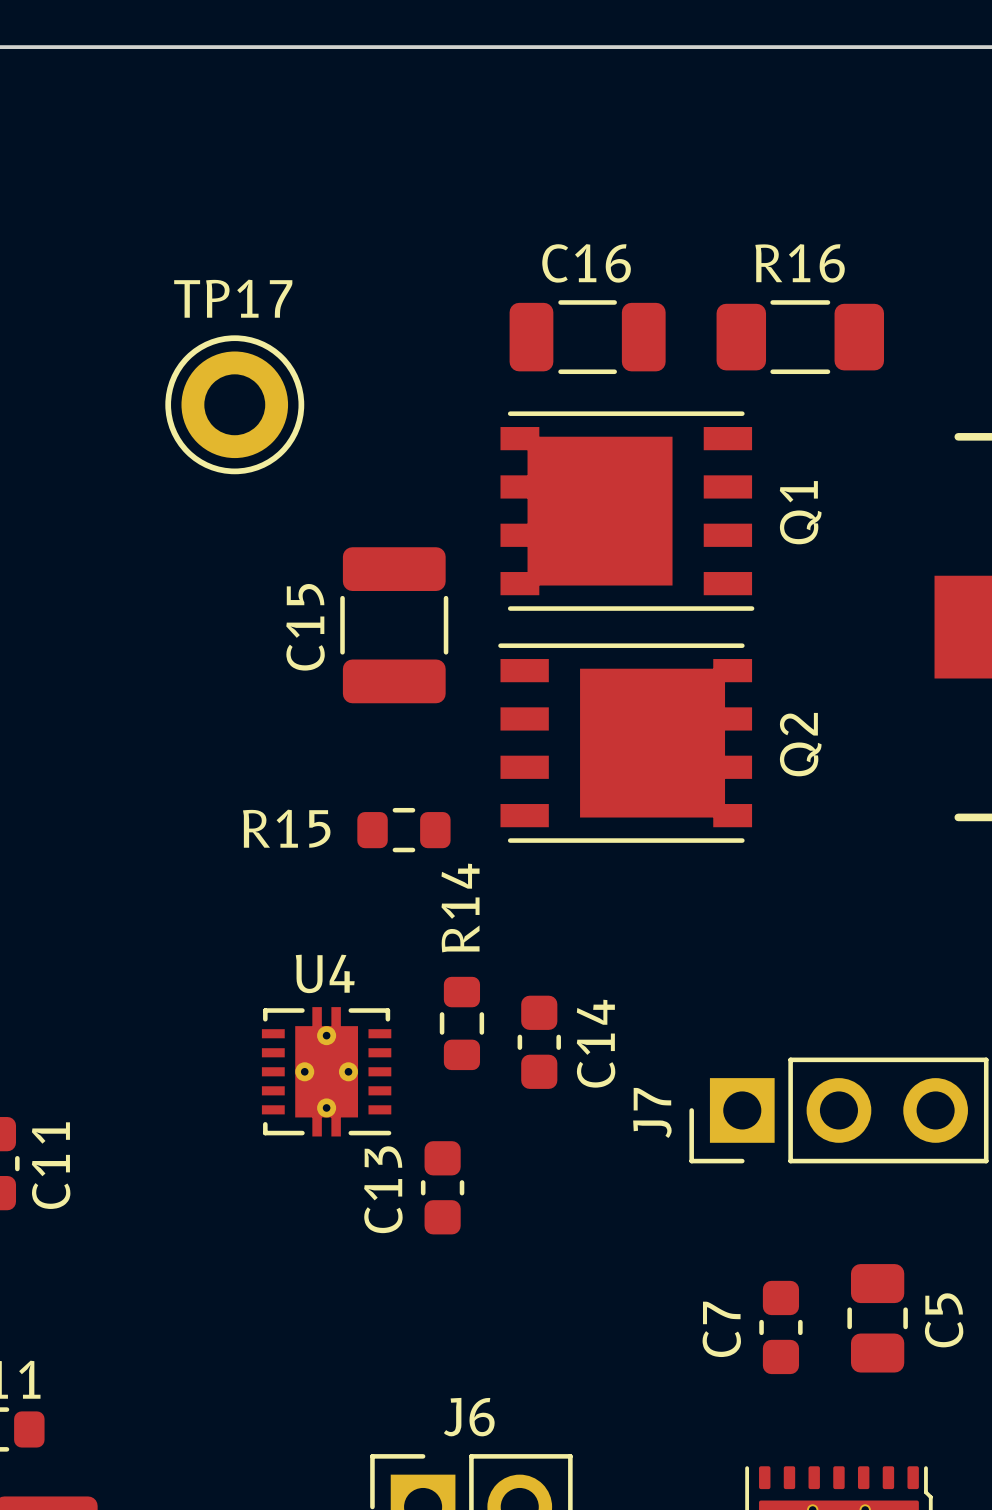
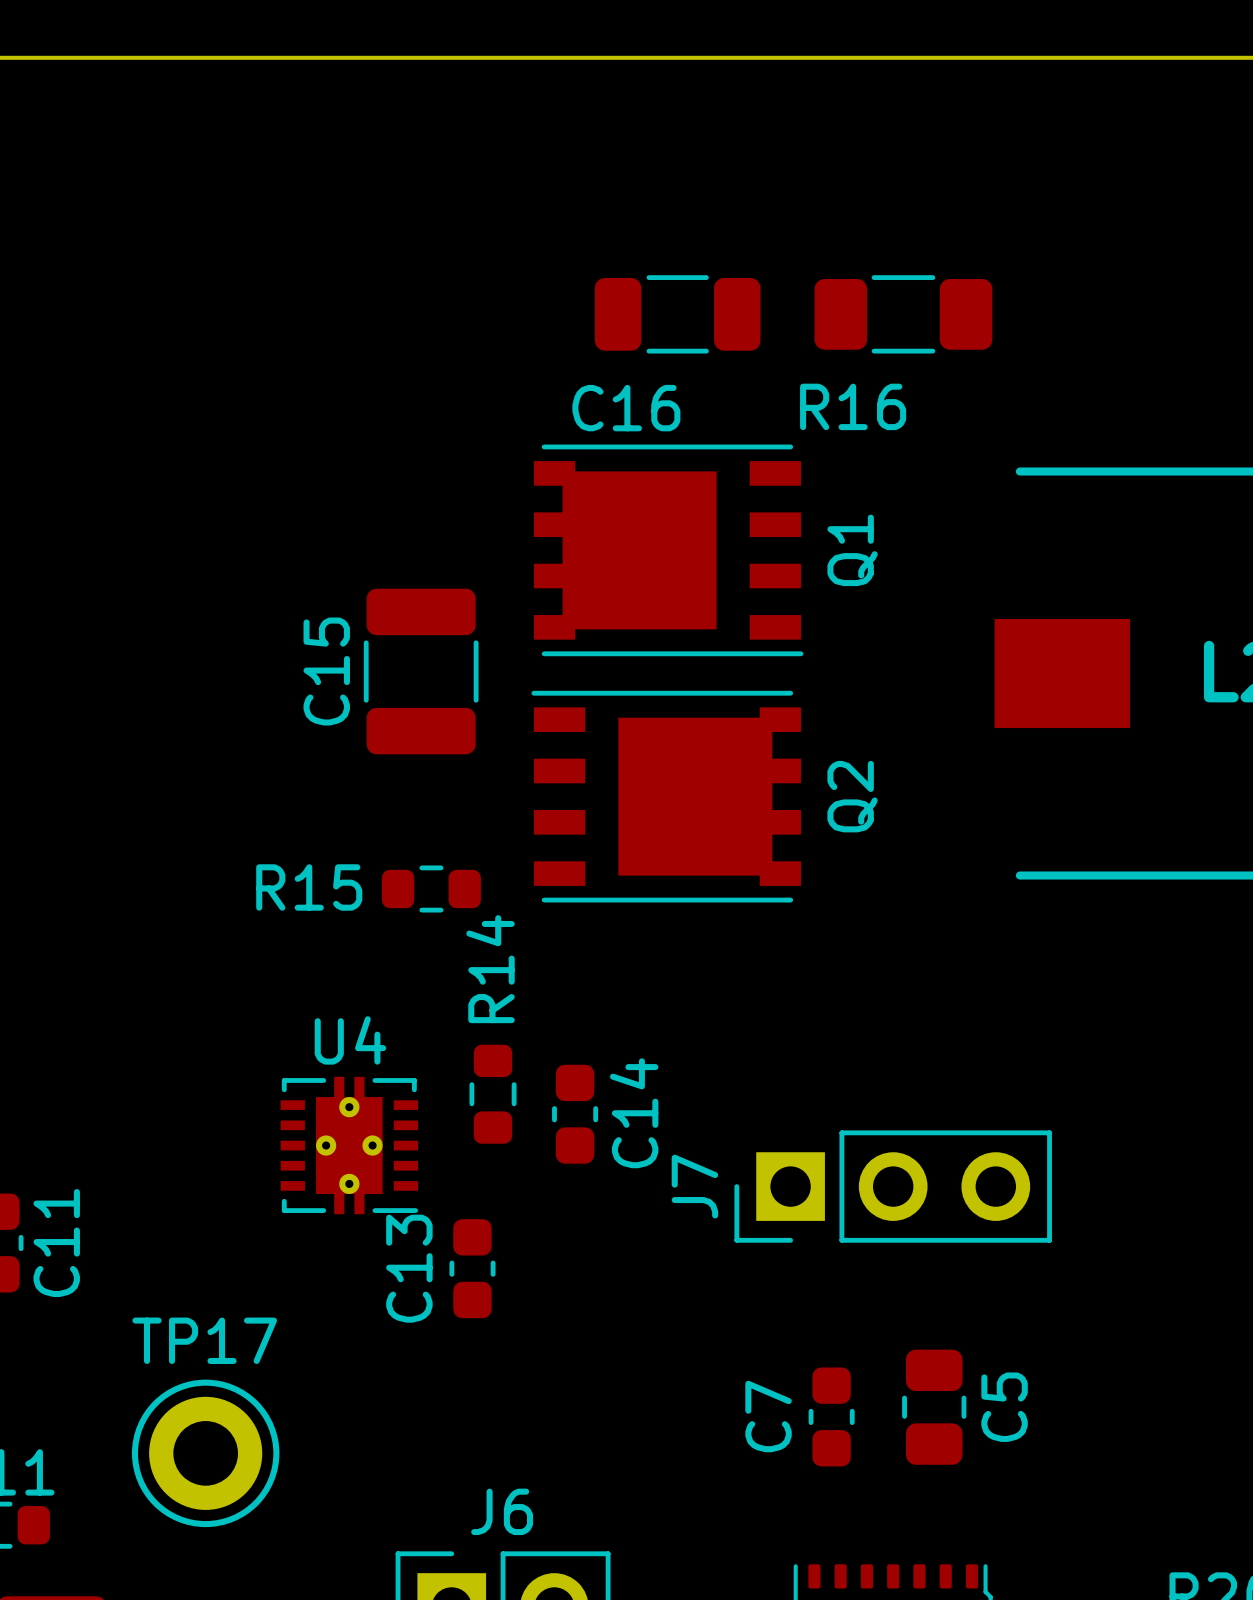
C16 name position: C16 (586, 263) -> C16 (626, 408)
R16 name position: R16 (800, 263) -> R16 (853, 406)
C16 position: (587, 337) -> (677, 314)
R16 position: (800, 337) -> (903, 314)
TP17 position: (234, 404) -> (205, 1453)

